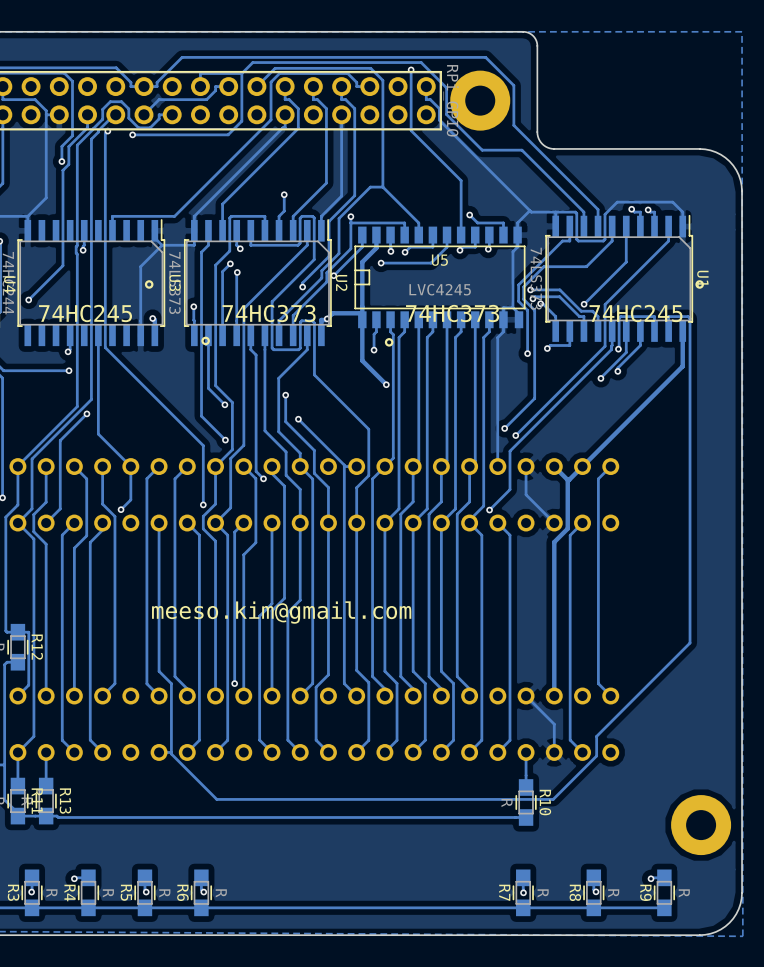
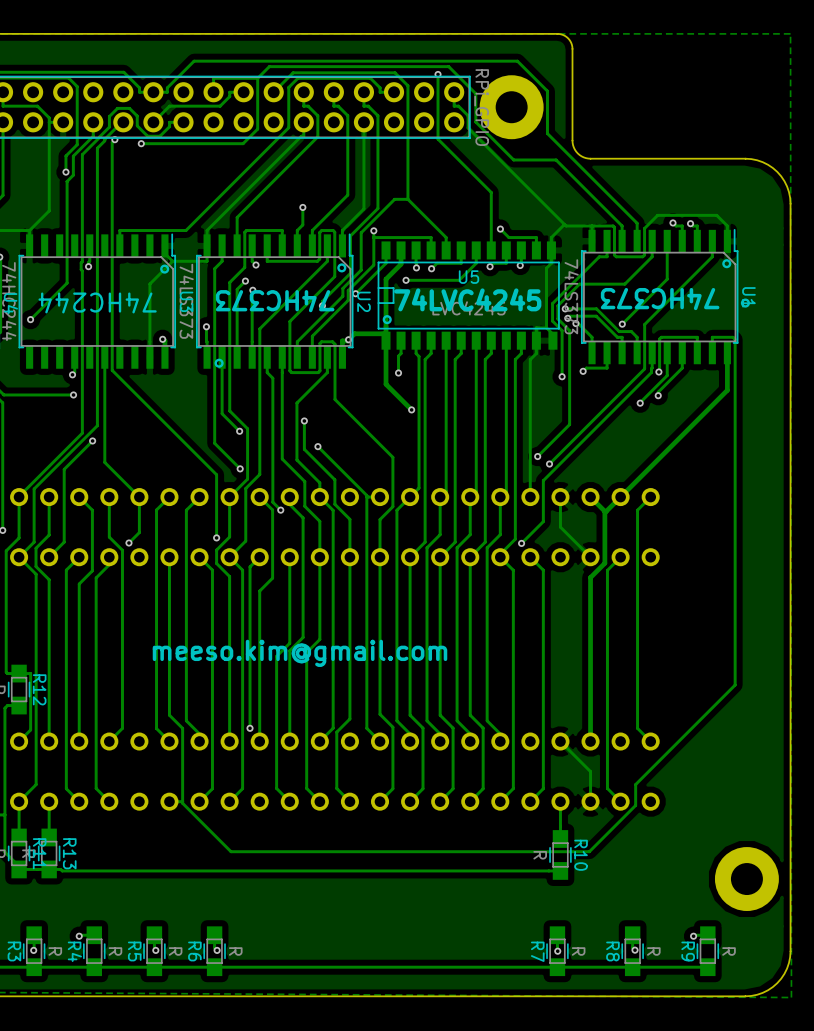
drawing: none -> [722, 259, 732, 269]
drawing: none -> [337, 263, 347, 273]
text: none -> 74HC373 (660, 299)
text: none -> 74LVC4245 (467, 299)
drawing position: (149, 284) -> (164, 269)
text: 74HC245 (85, 313) -> 74HC244 (97, 302)
text rotation: 0° (269, 313) -> 180° (275, 301)
text: 74HC373 (452, 313) -> none
text: 74HC245 (636, 313) -> none
drawing position: (389, 342) -> (387, 319)

